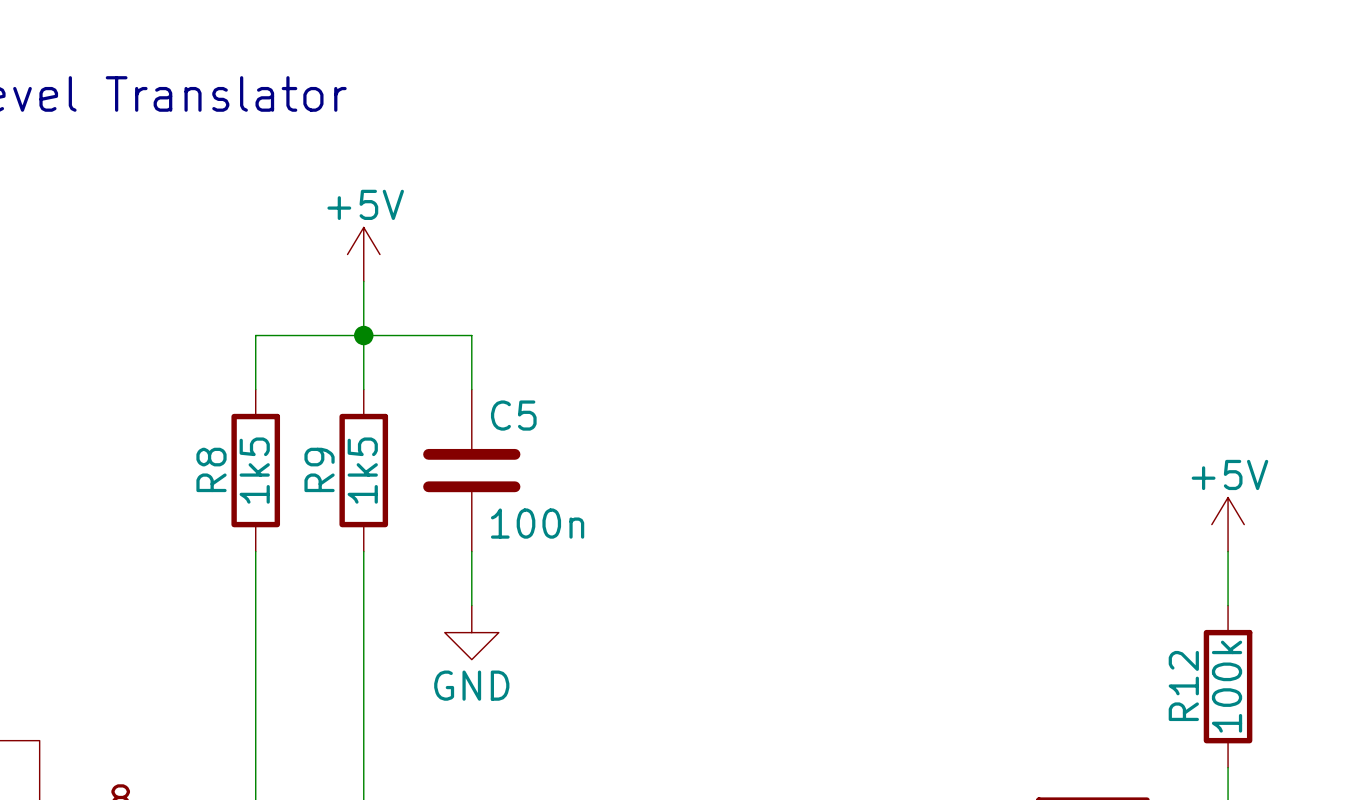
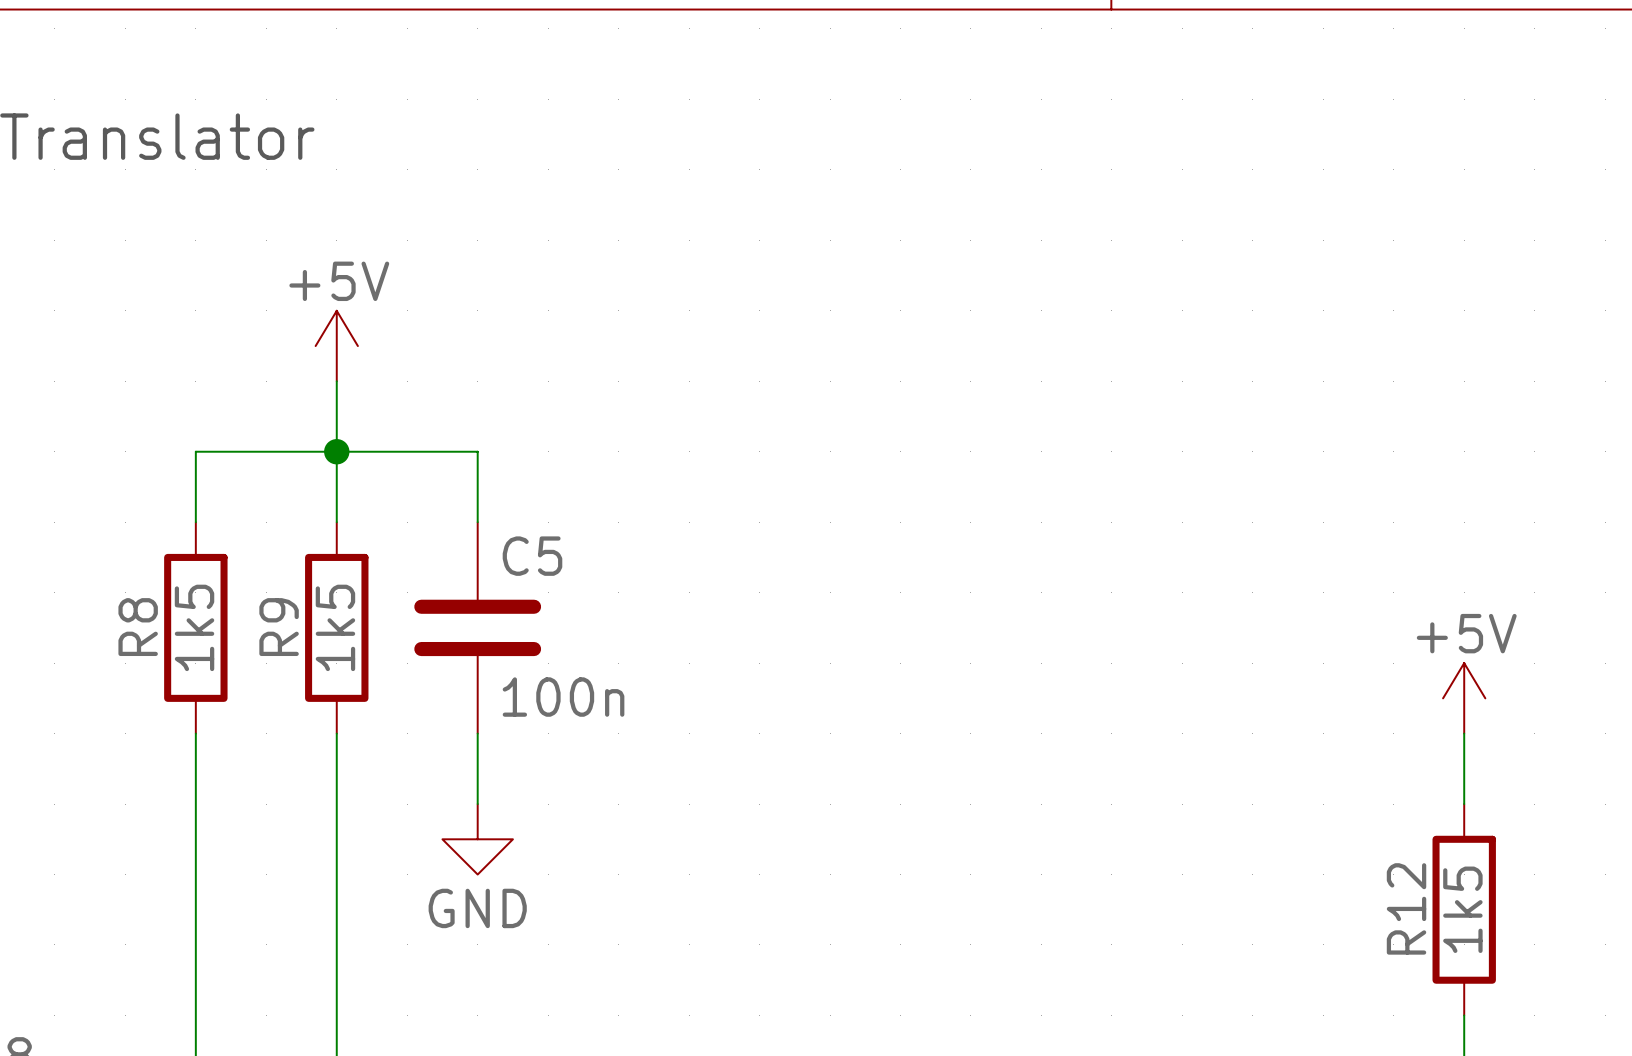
R12 value: 100k (1227, 686) -> 1k5 (1462, 909)

